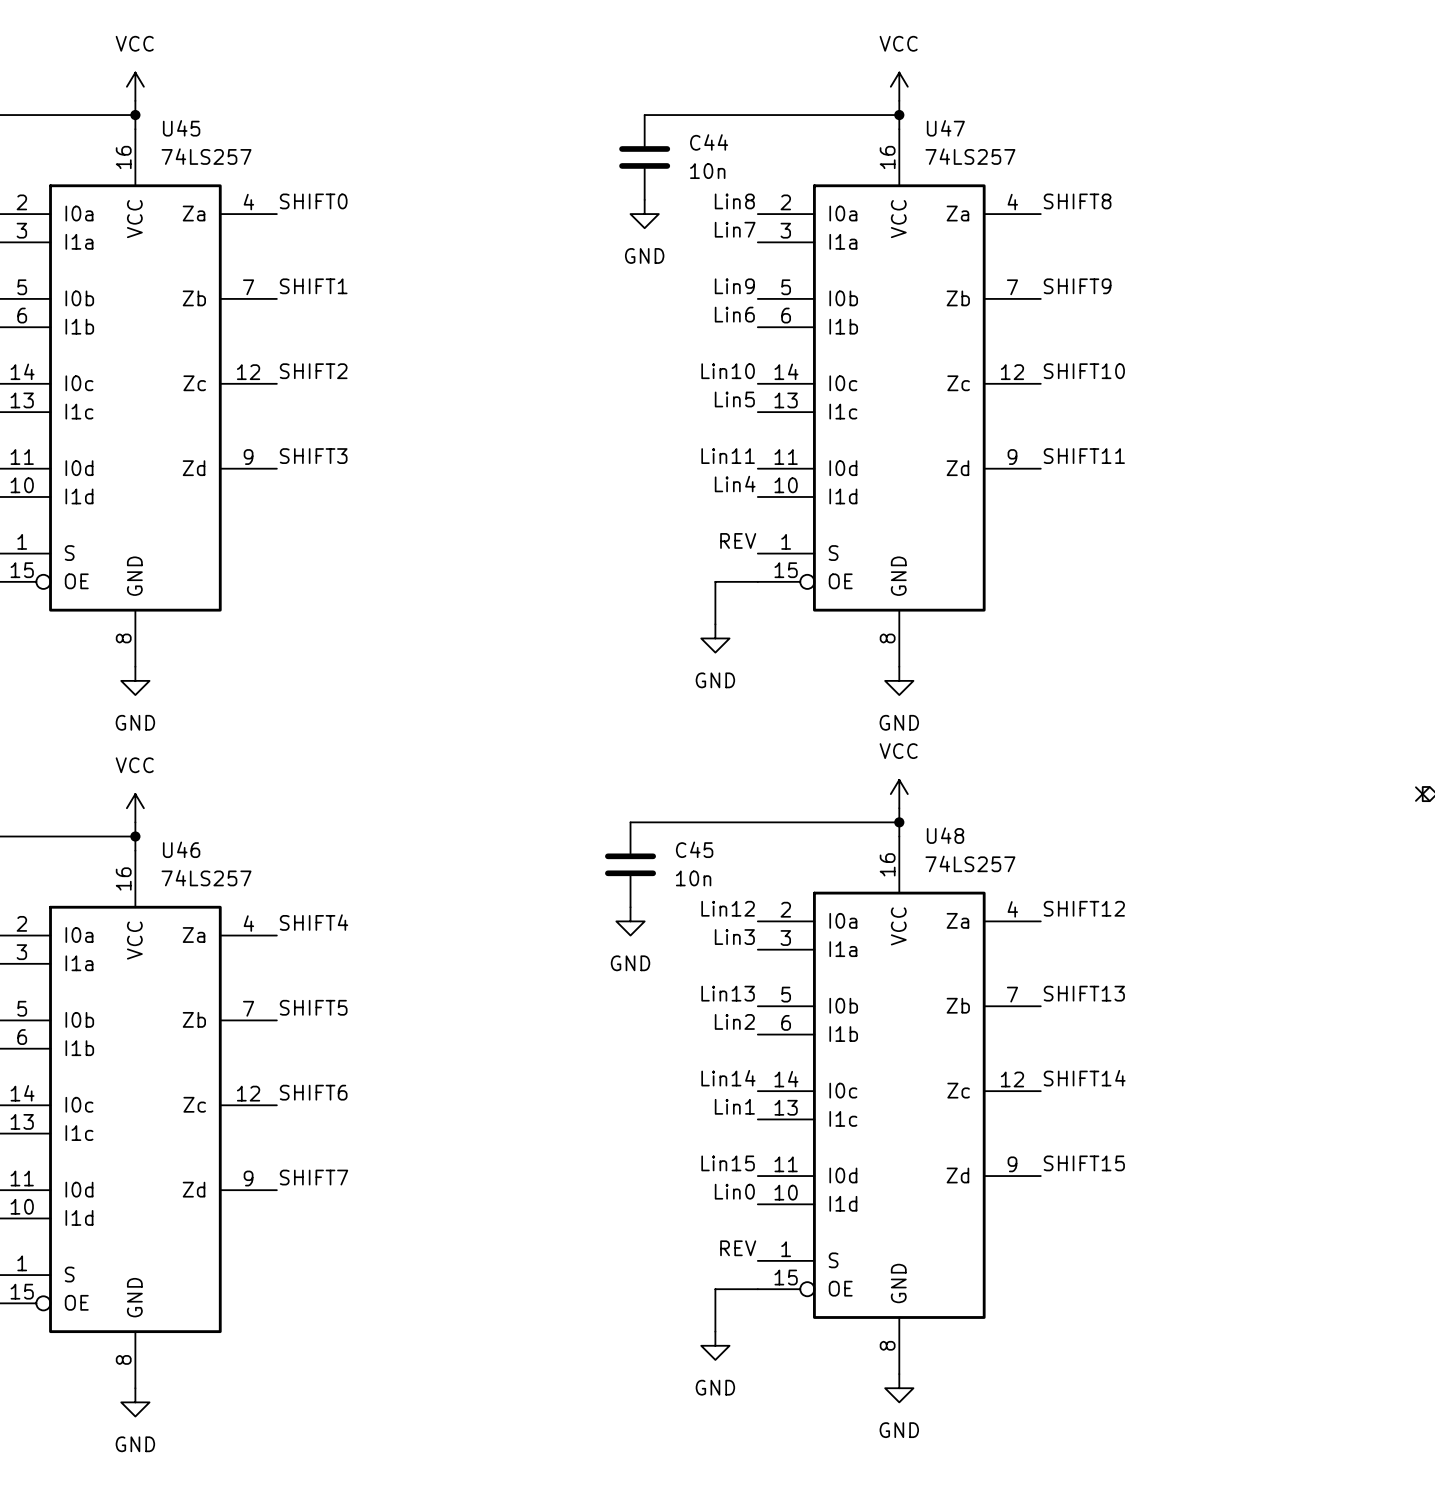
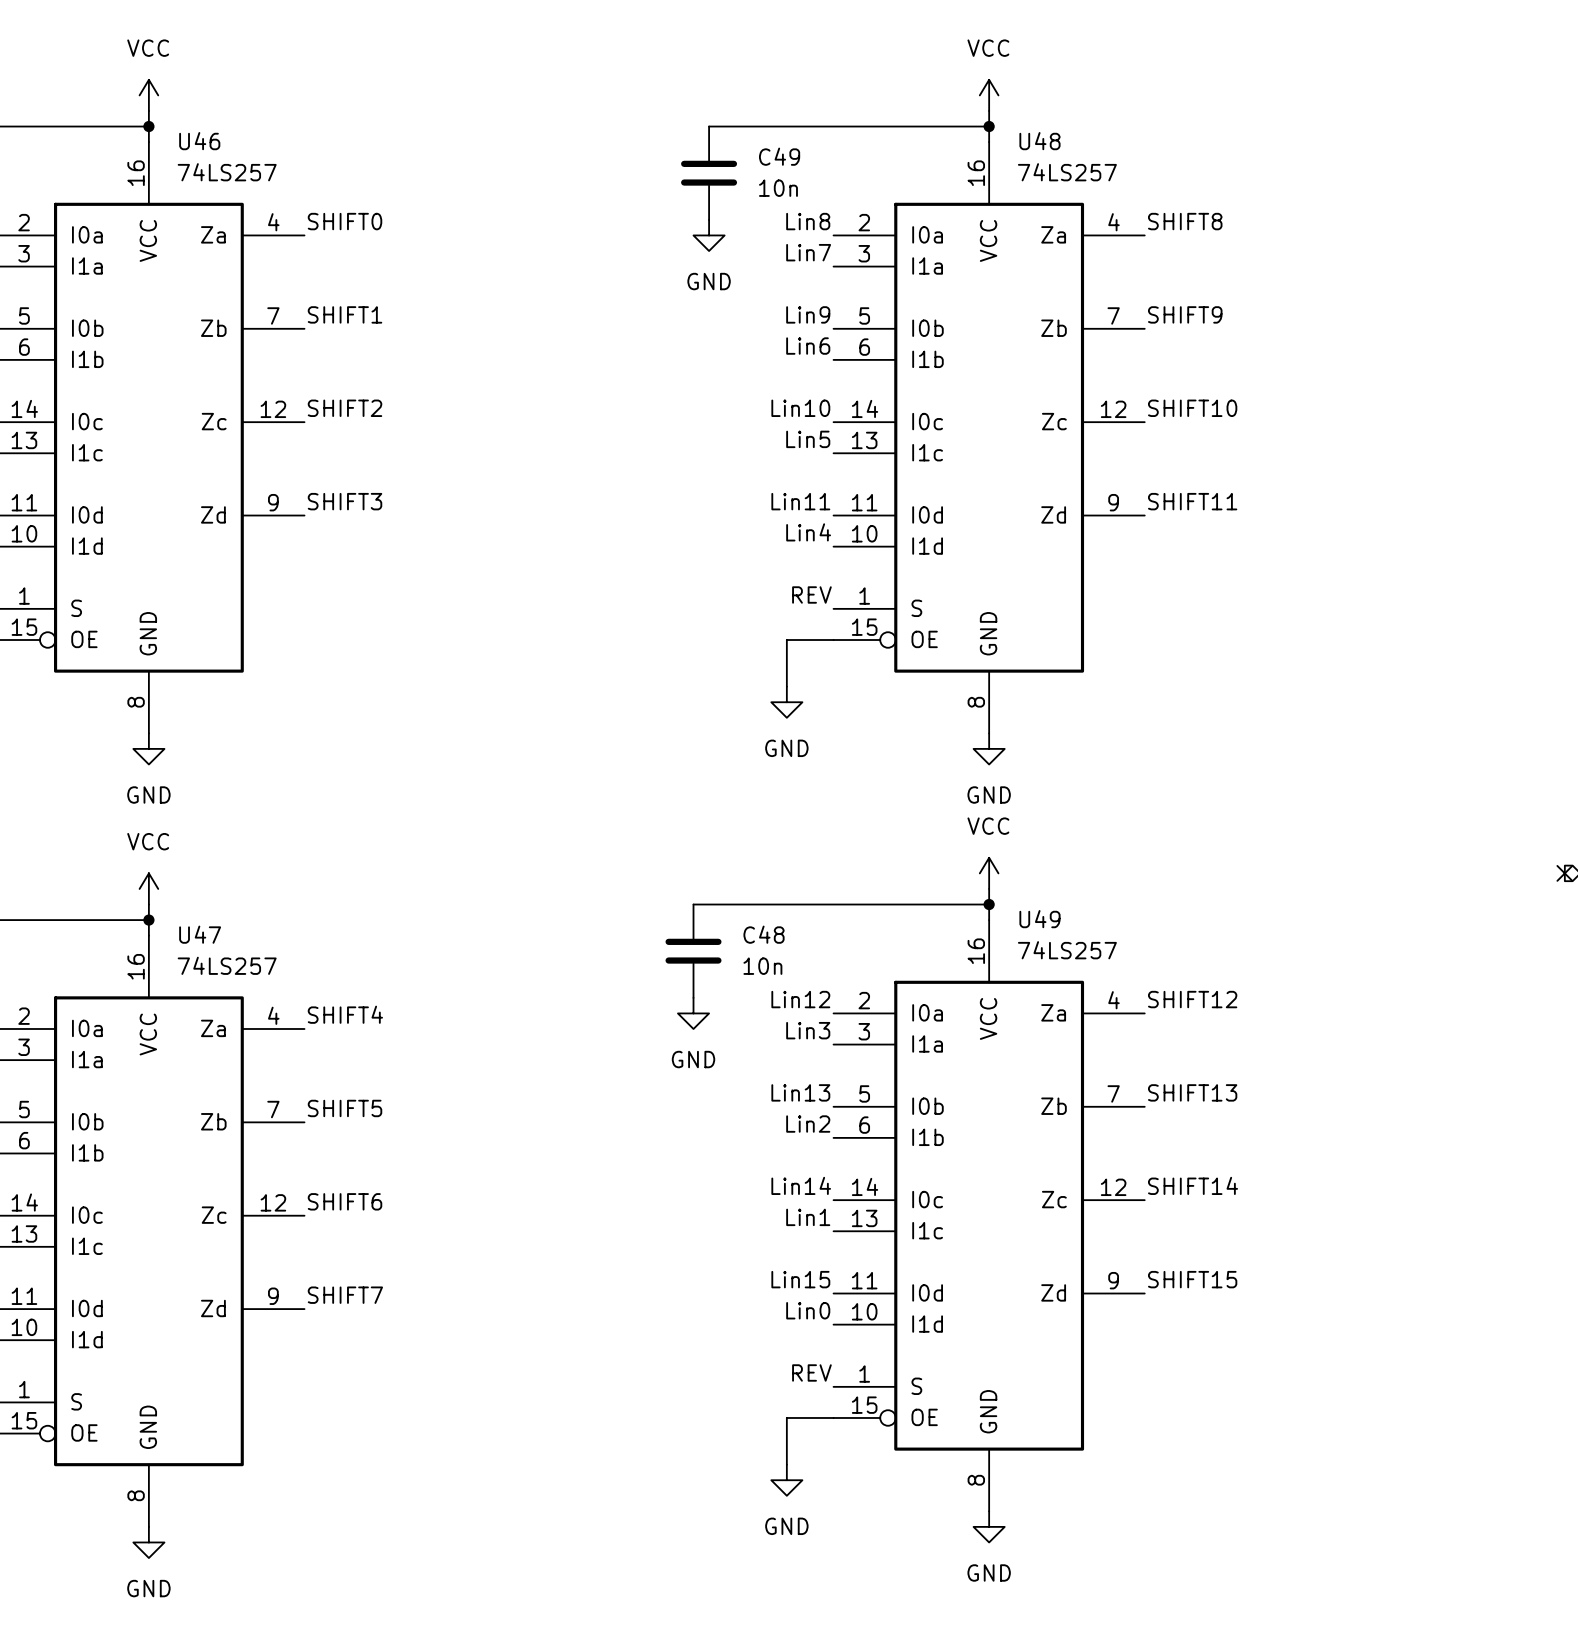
U45 name: U45 (181, 128) -> U46 (199, 141)
U47 name: U47 (945, 128) -> U48 (1039, 141)
C44 name: C44 (709, 142) -> C49 (779, 156)
U48 name: U48 (945, 835) -> U49 (1039, 919)
U46 name: U46 (181, 849) -> U47 (200, 934)
C45 name: C45 (694, 849) -> C48 (764, 934)

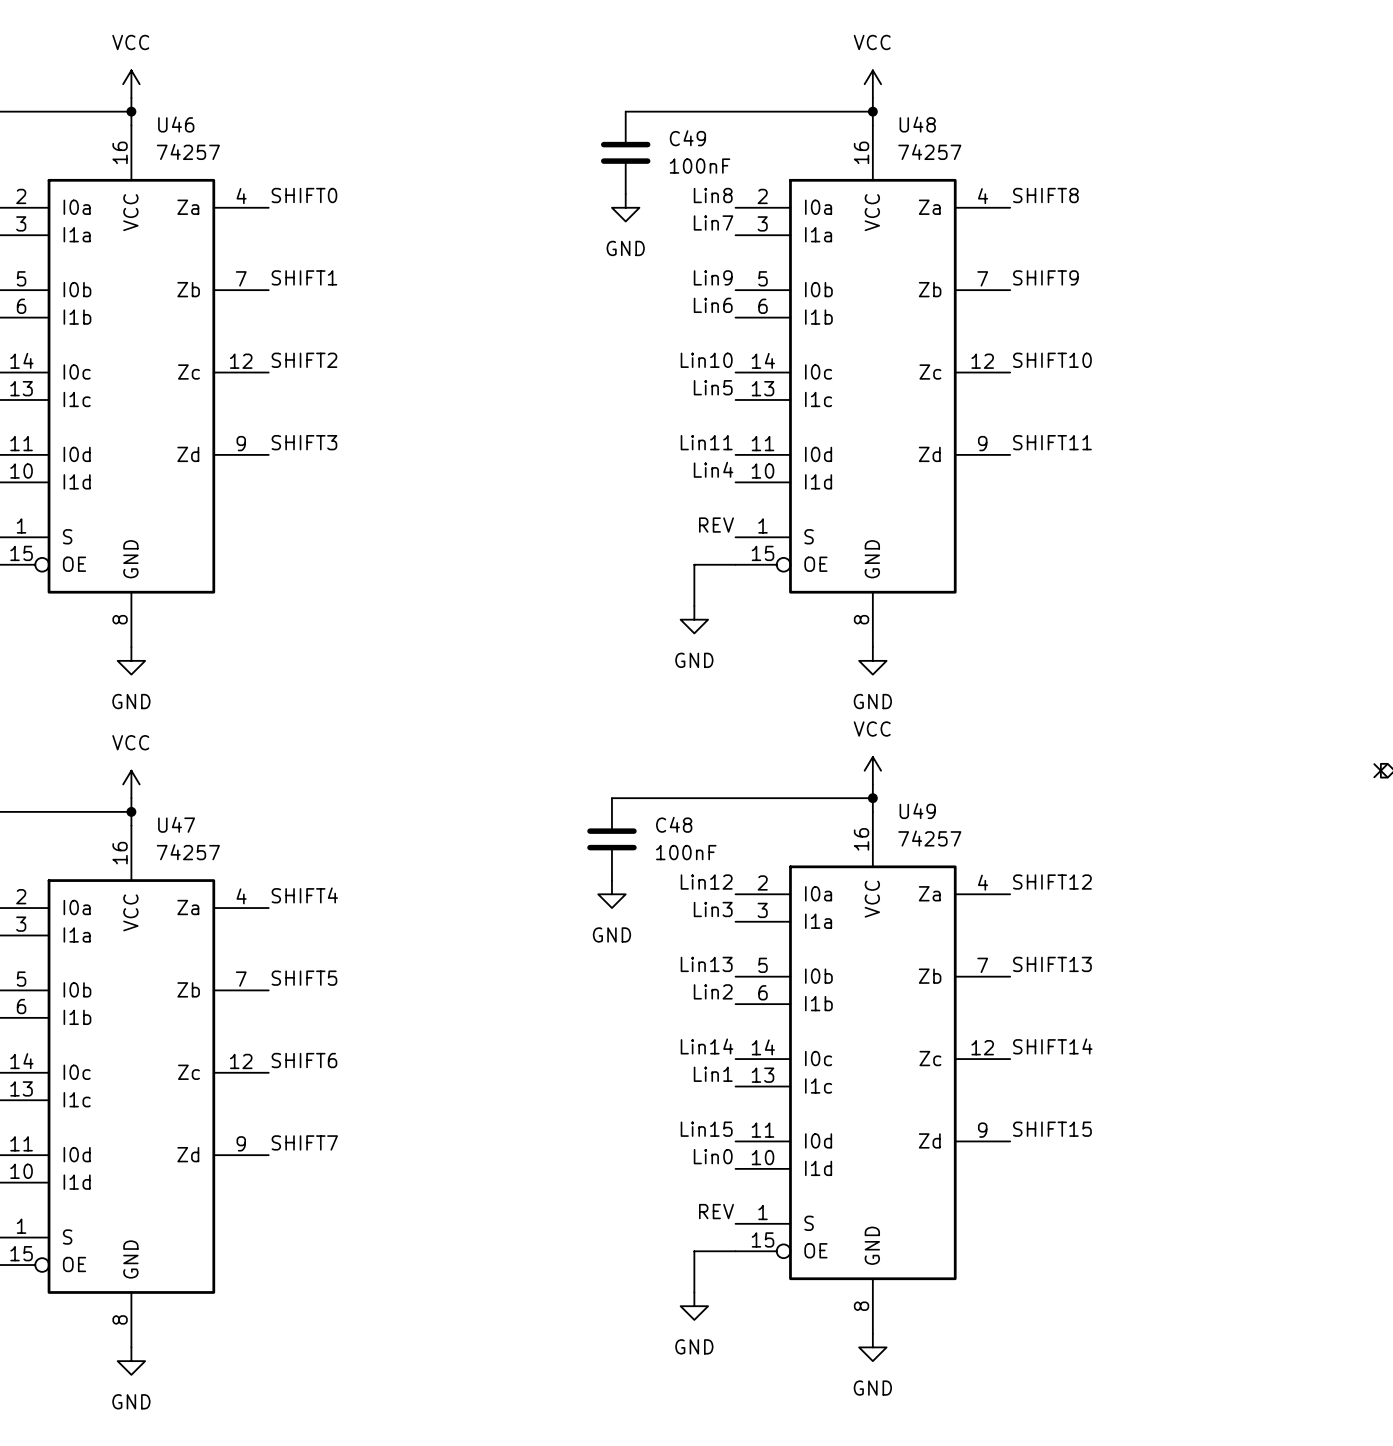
U46 value: 74LS257 (227, 172) -> 74257 (188, 152)
U48 value: 74LS257 (1067, 172) -> 74257 (929, 152)
C49 value: 10n (778, 188) -> 100nF (700, 166)
U49 value: 74LS257 (1067, 950) -> 74257 (929, 838)
U47 value: 74LS257 (227, 965) -> 74257 (188, 852)
C48 value: 10n (762, 966) -> 100nF (686, 852)

